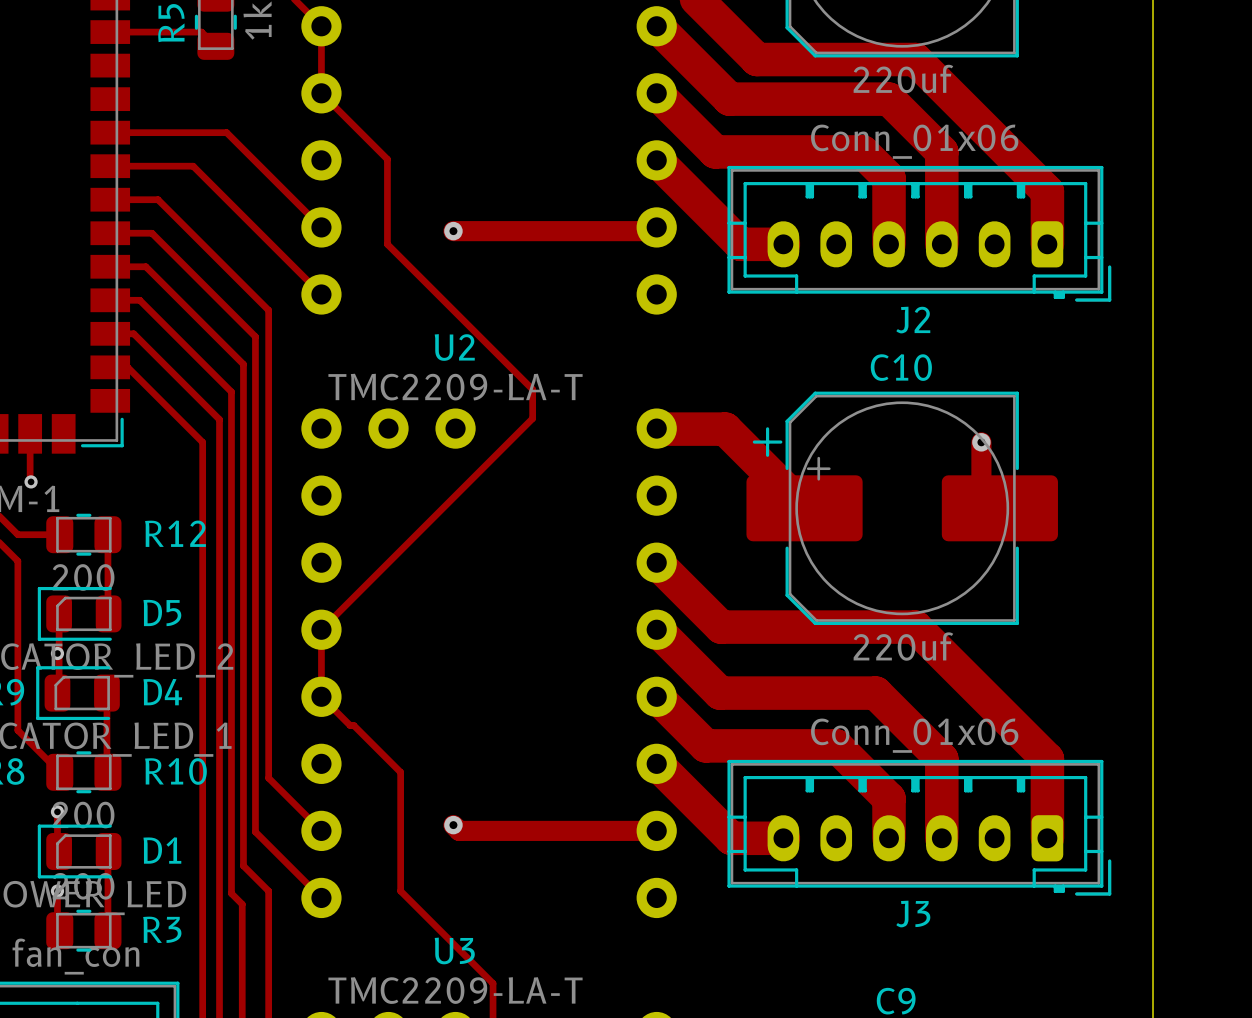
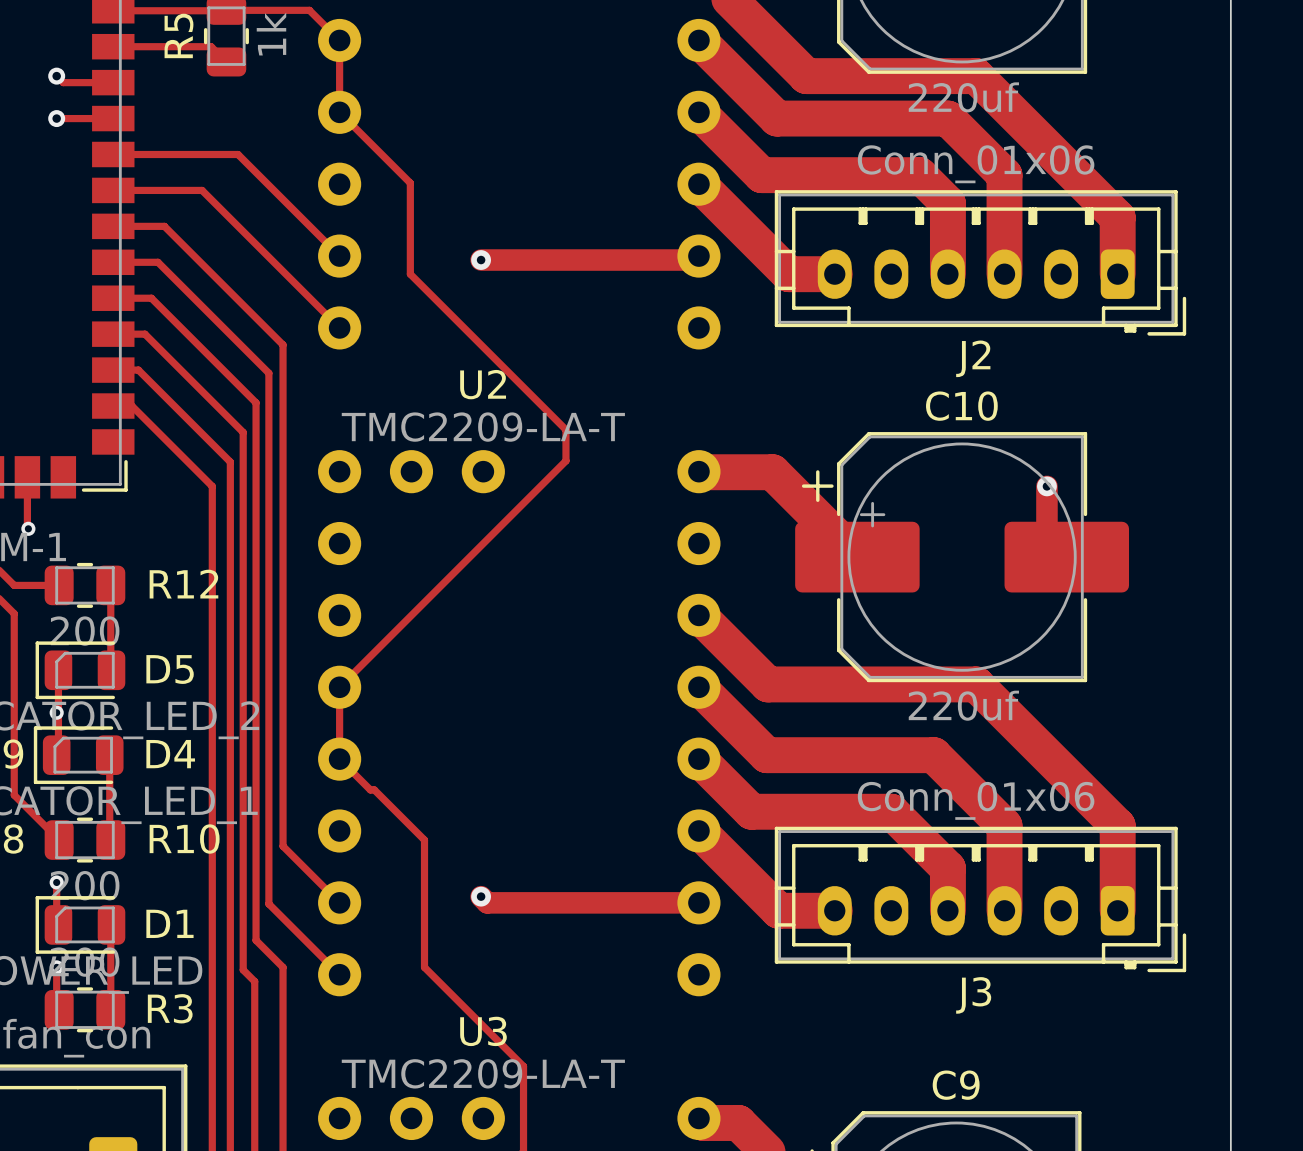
track: none -> (56, 76) (63, 82) (113, 82)
via: none -> (56, 76)
track: none -> (56, 118) (113, 118)
via: none -> (56, 118)

